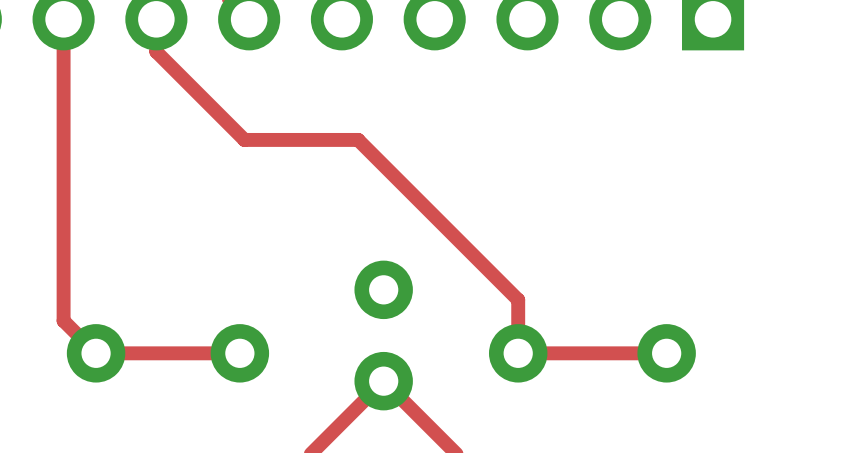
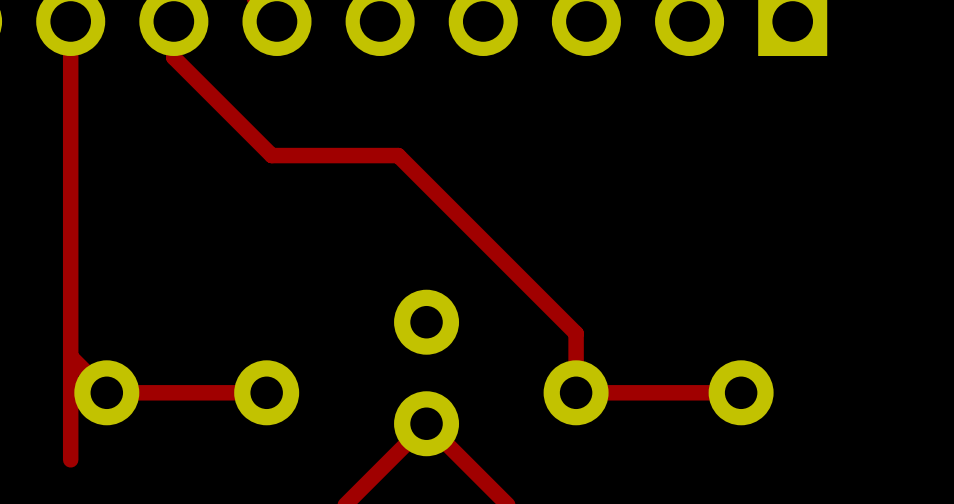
top track: none -> (70, 356) (70, 459)

